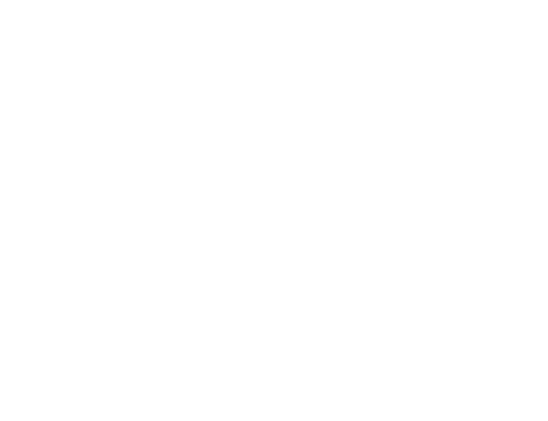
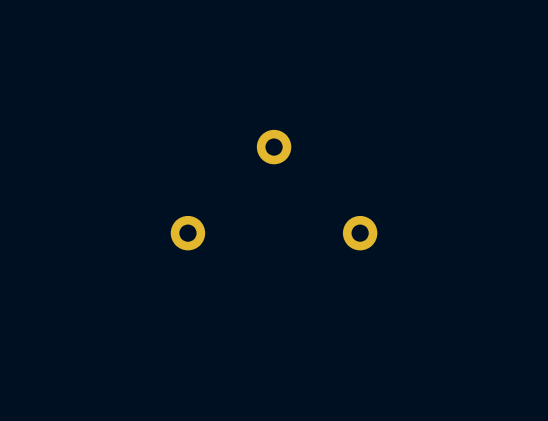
part: none -> (274, 190)

